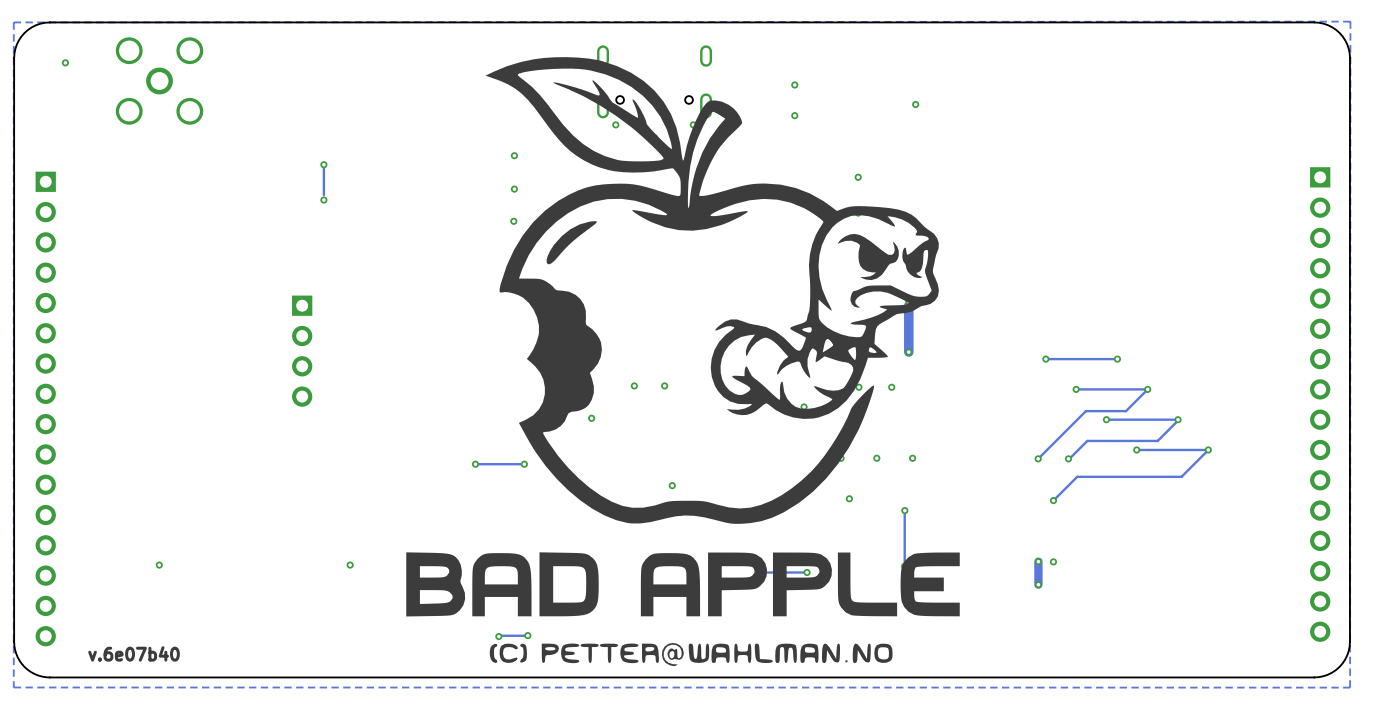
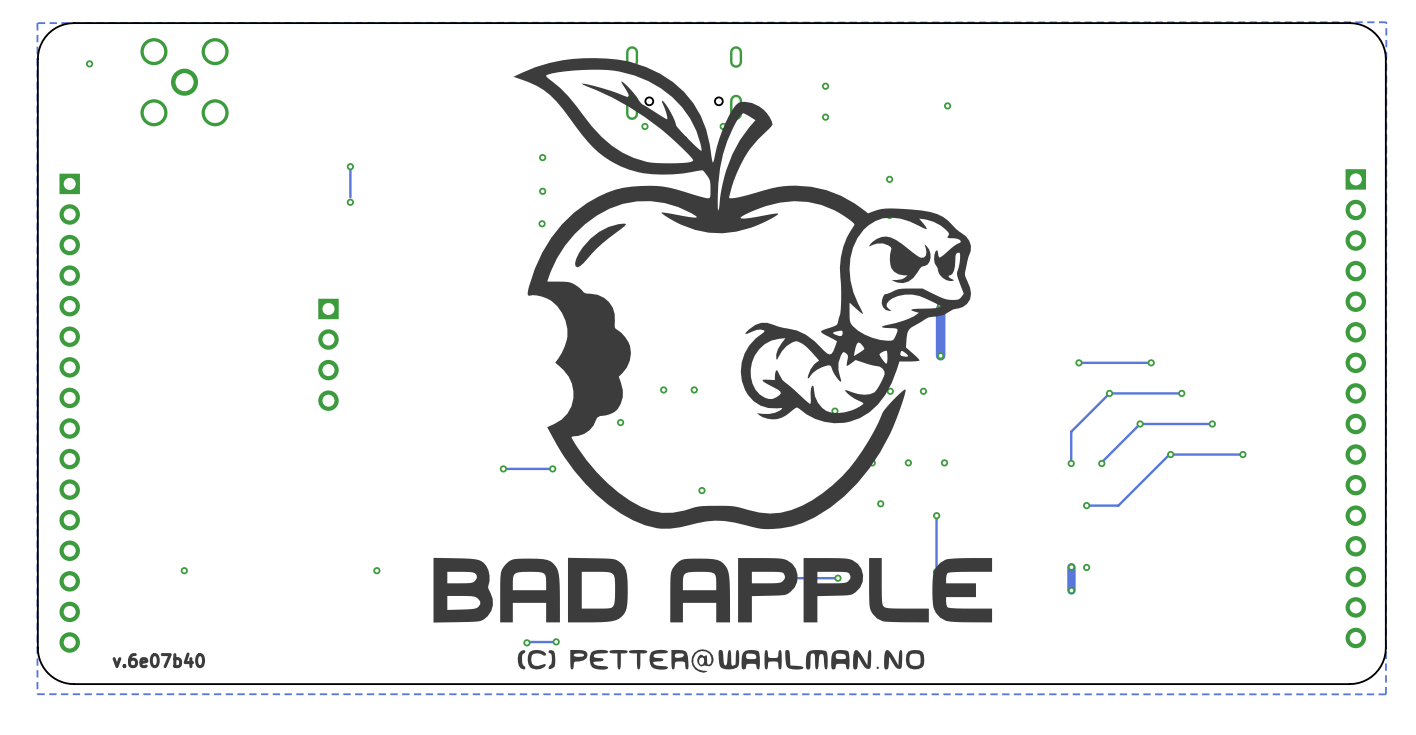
track: (1147, 389) (1125, 411) (1085, 411) (1038, 458) -> (1109, 393) (1071, 431) (1071, 463)
track: none -> (1140, 423) (1101, 462)
track: (1178, 419) (1157, 440) (1087, 440) (1068, 458) -> none
track: (1208, 450) (1181, 476) (1077, 476) (1053, 500) -> (1169, 454) (1118, 505) (1086, 505)

